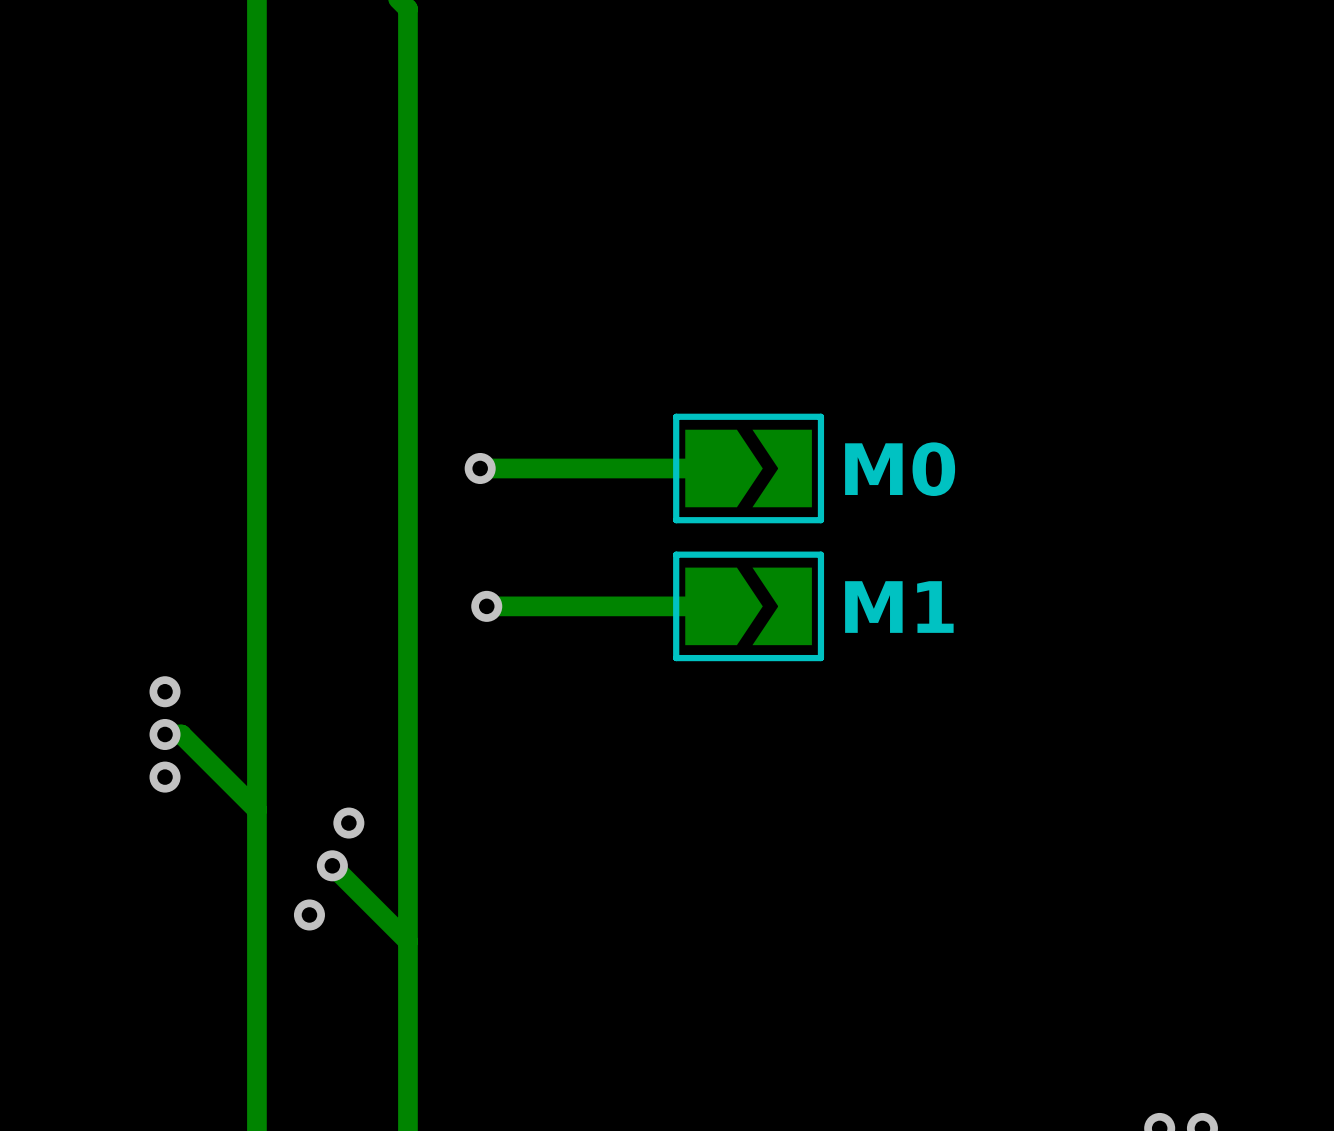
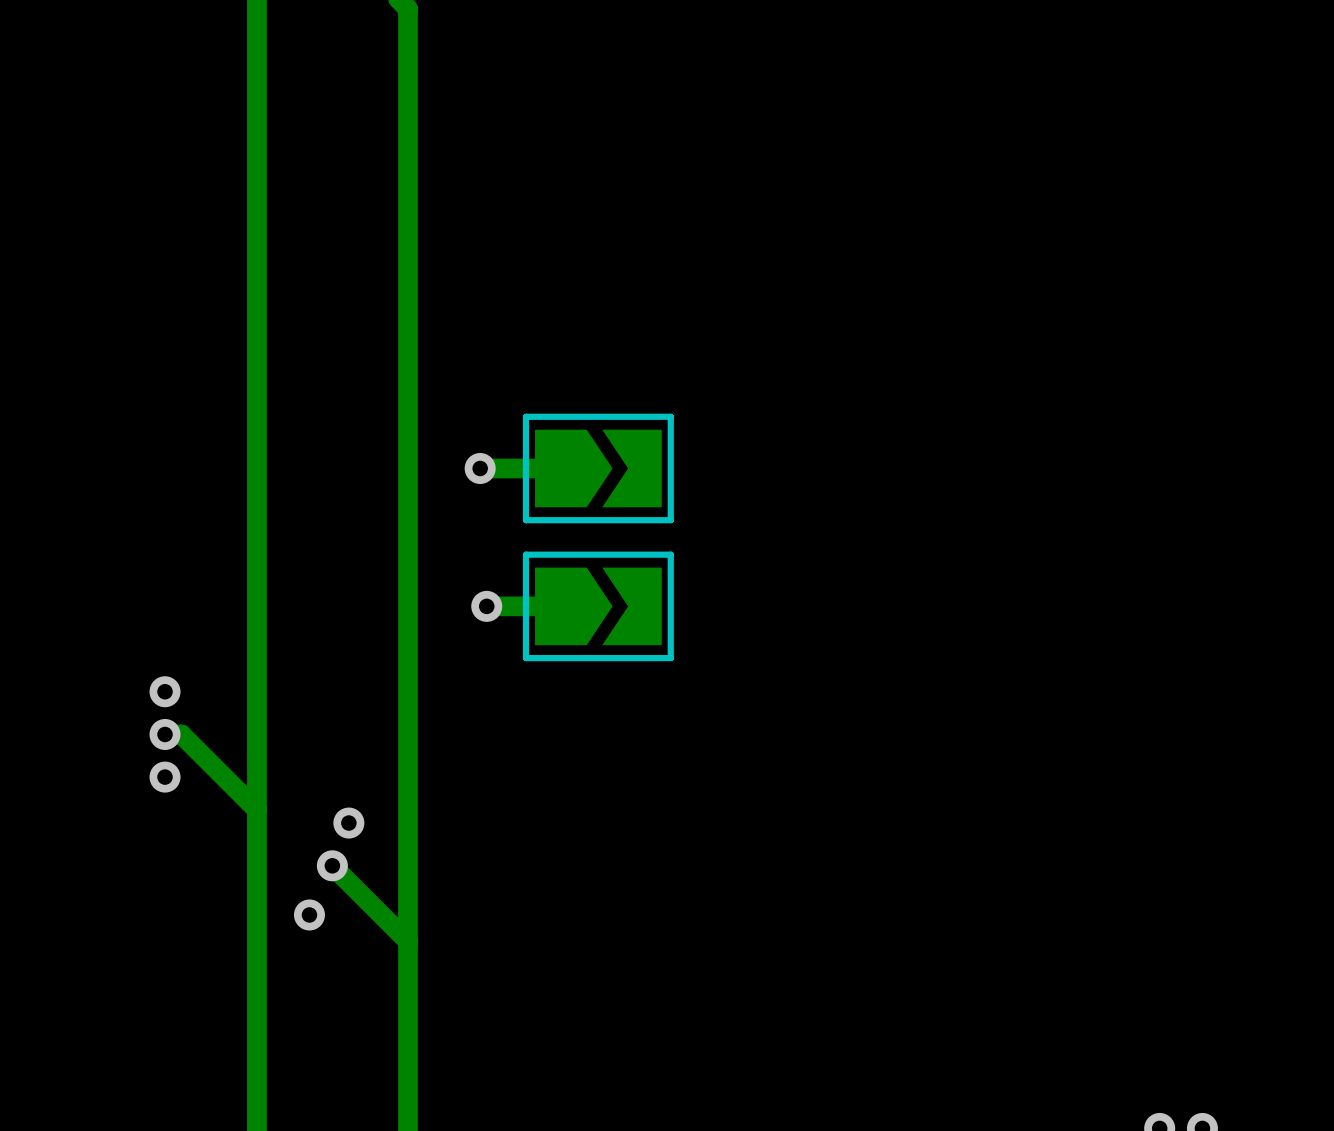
part: none -> (598, 468)
track: (711, 468) (560, 468) -> none
part: (748, 468) -> none
text: M0 (900, 469) -> none
part: none -> (598, 606)
track: (711, 606) (560, 606) -> none
part: (748, 606) -> none
text: M1 (899, 607) -> none

